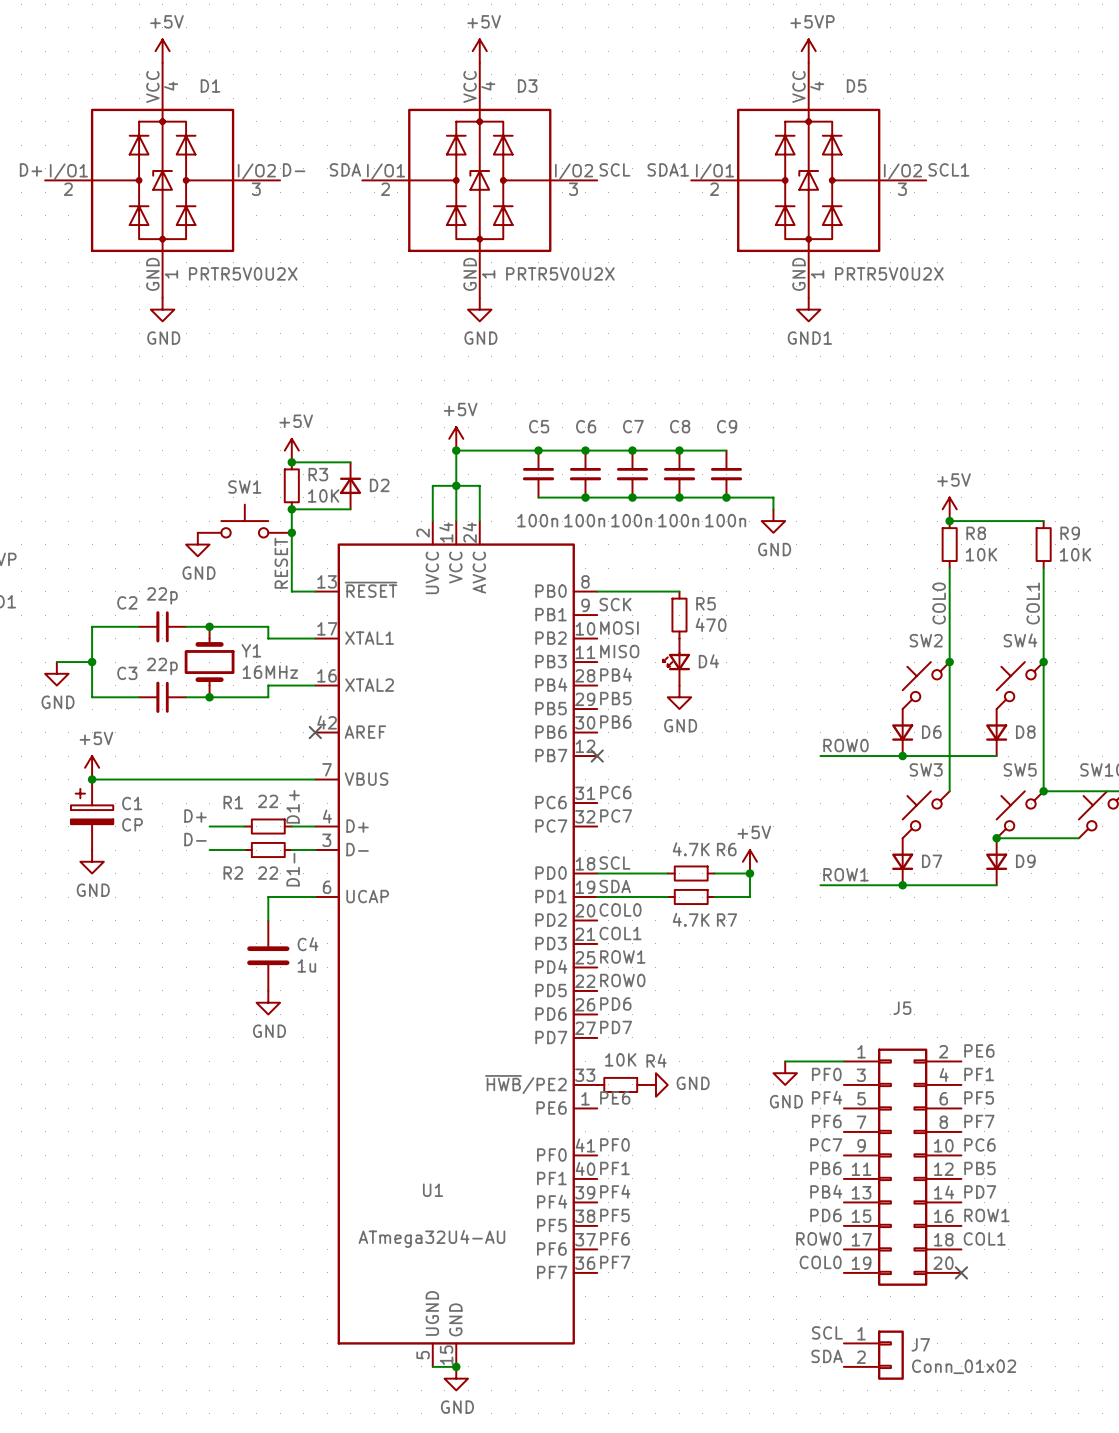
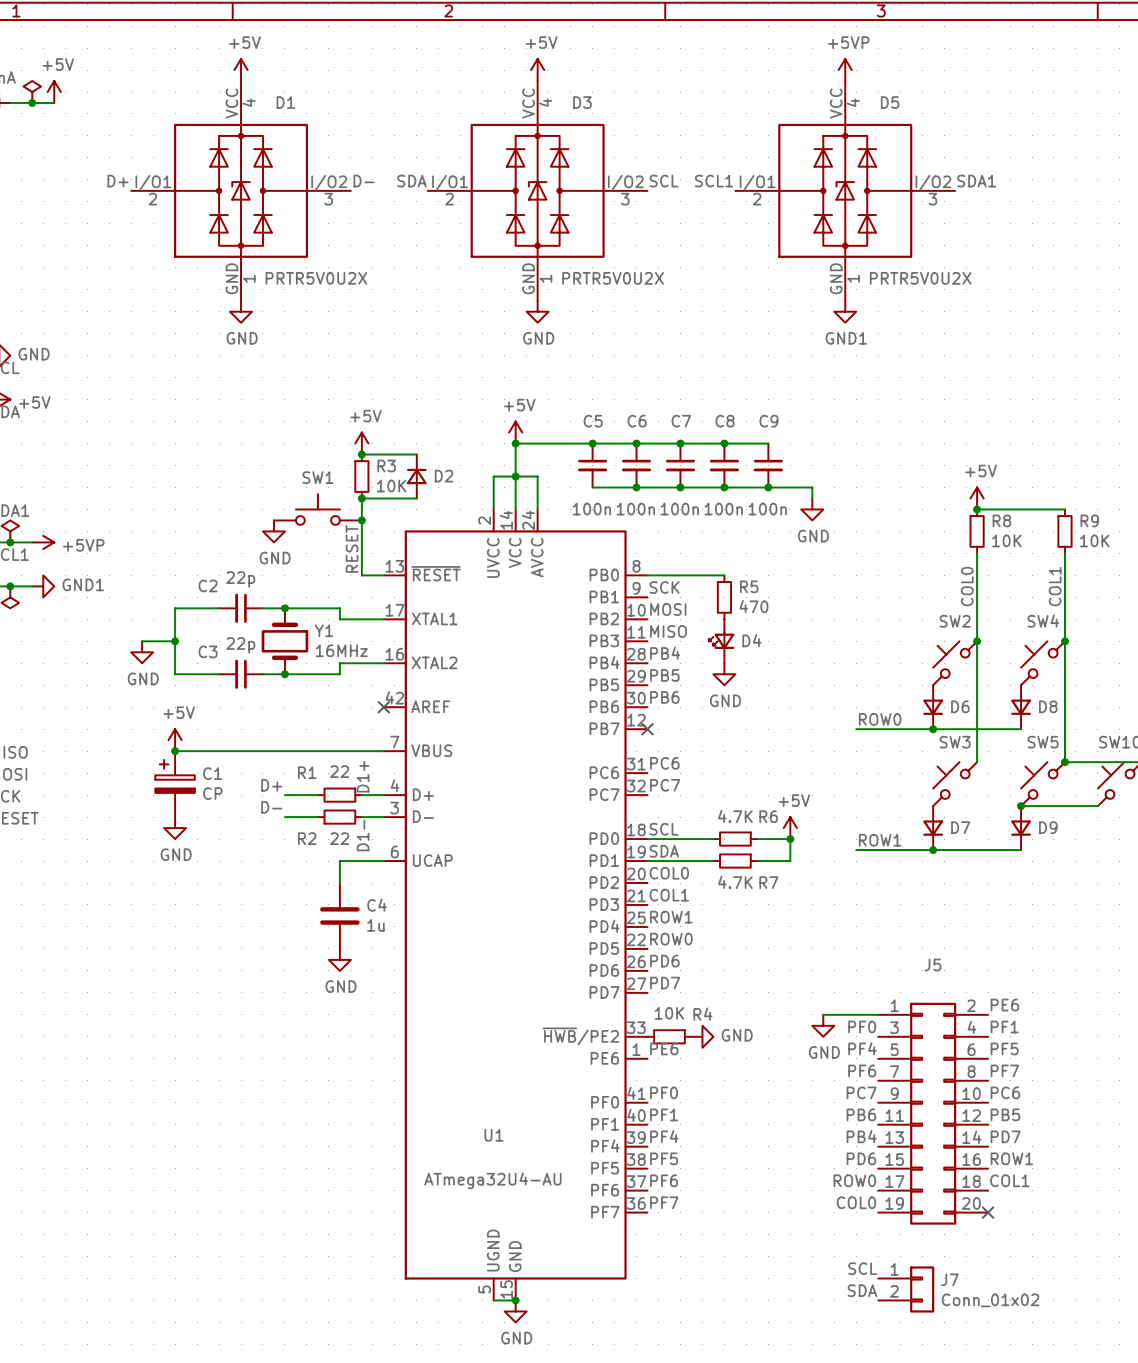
label: SDA1 (668, 169) -> SCL1 (714, 181)
label: SCL1 (948, 169) -> SDA1 (976, 181)

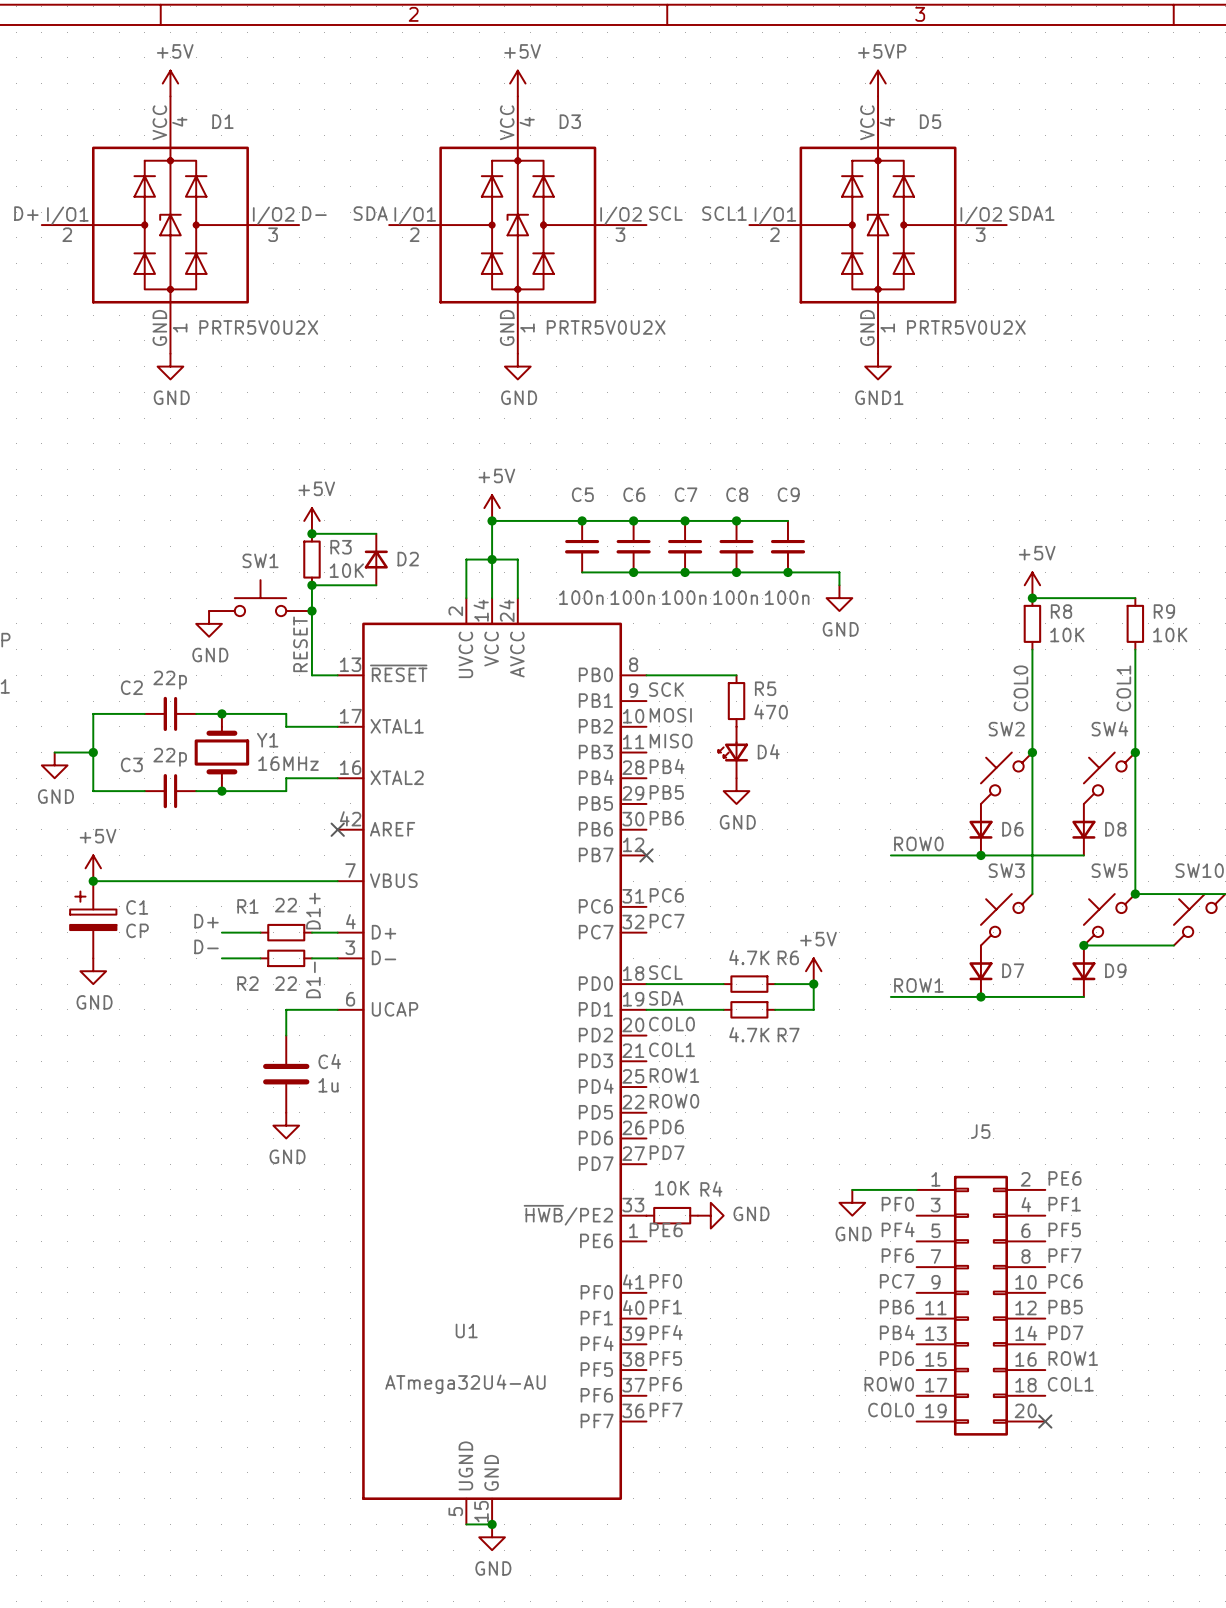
label: SCL (862, 1268) -> none
J7: Conn_01x02 (906, 1289) -> none
label: SDA (862, 1290) -> none

